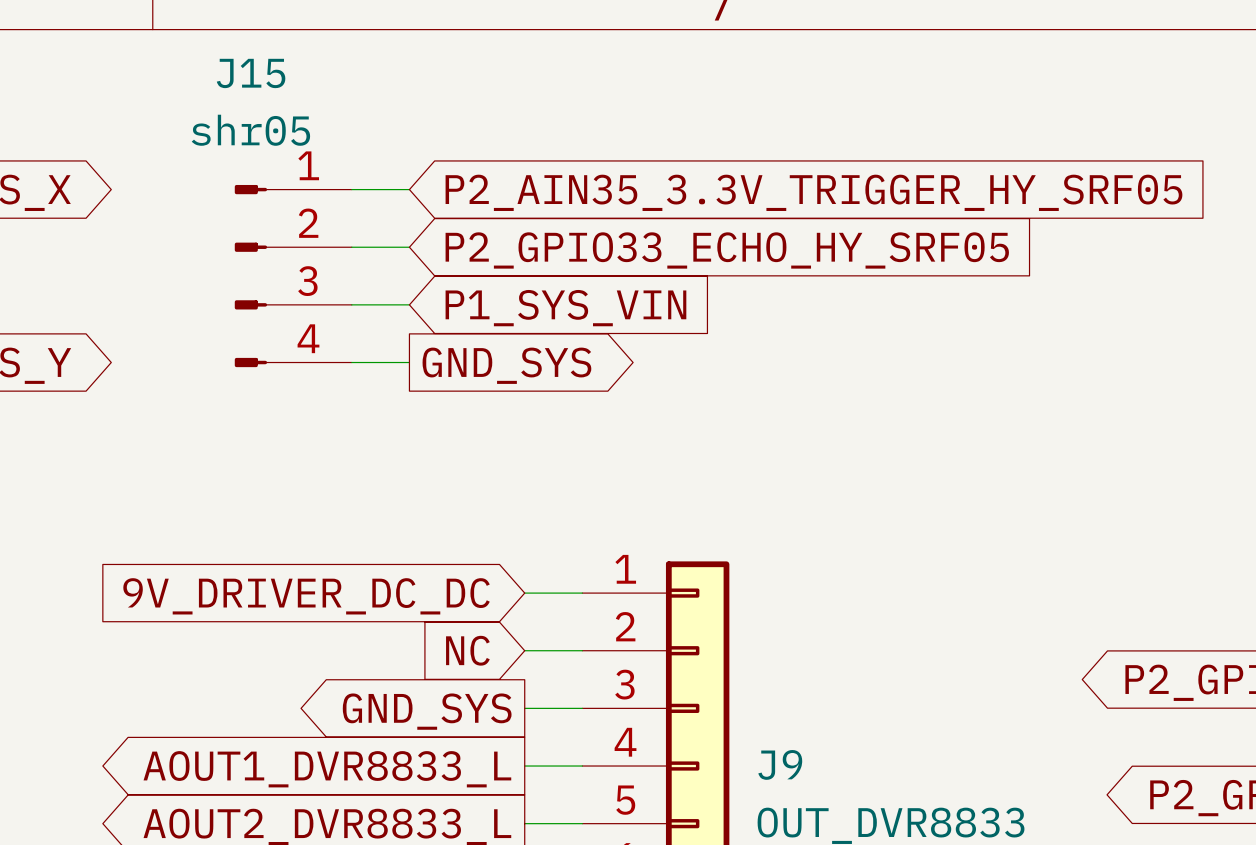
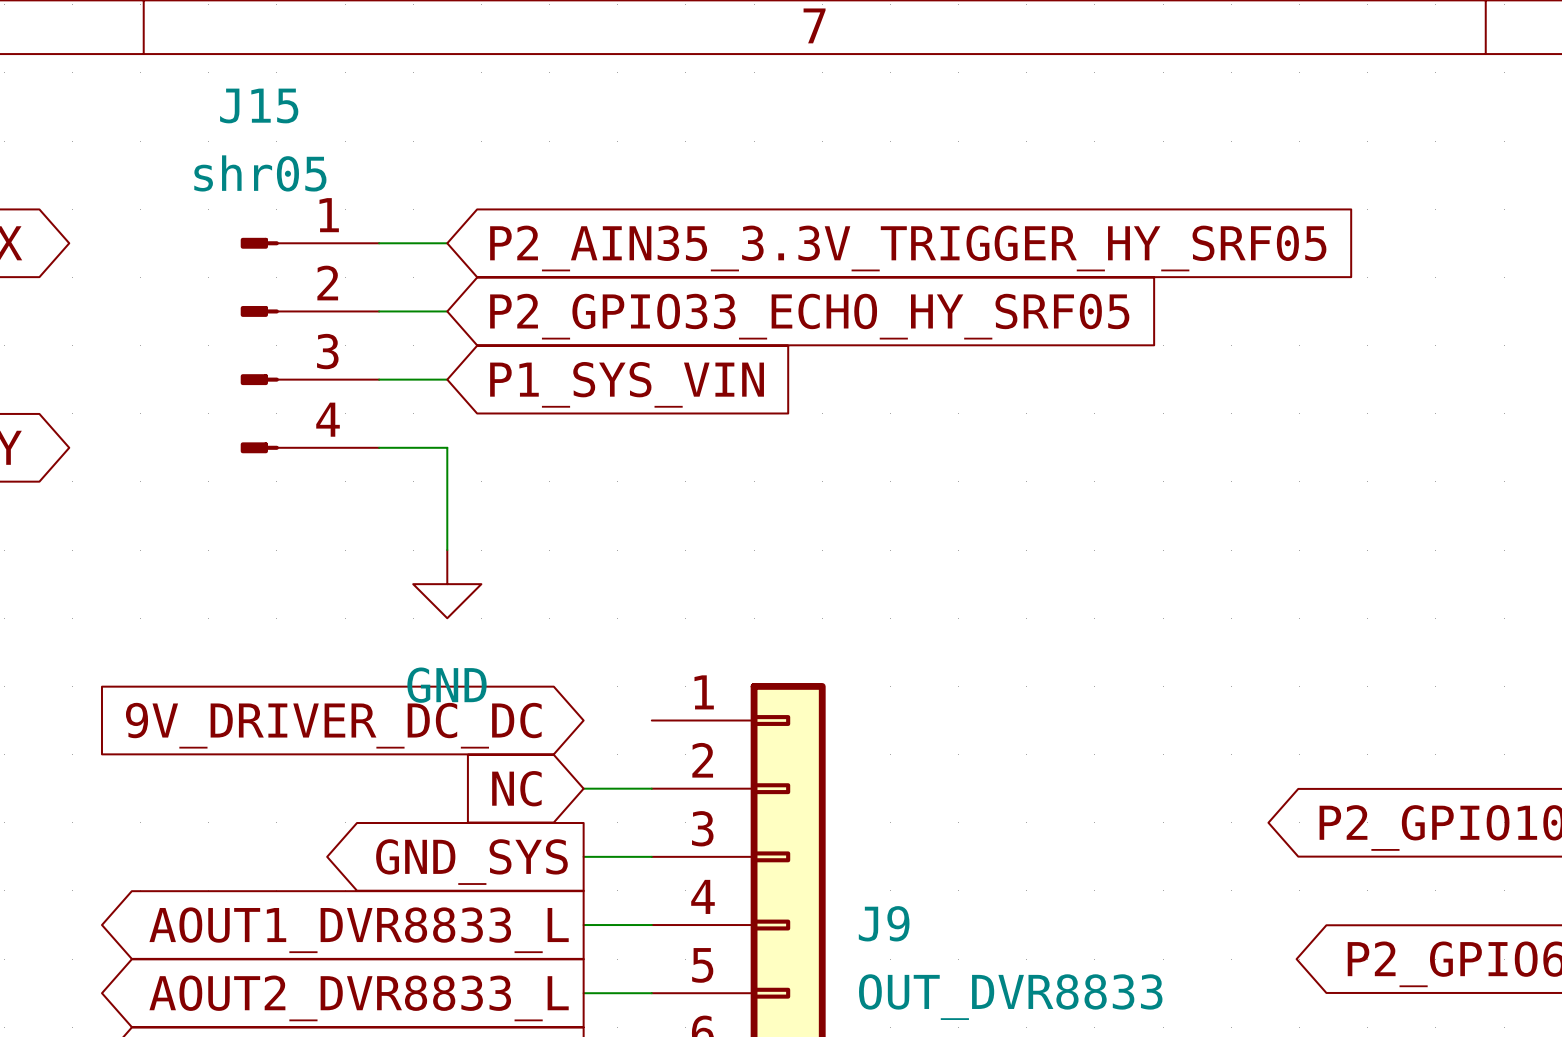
wire: none -> (447, 447) (447, 550)
global label: GND_SYS (506, 365) -> none
power symbol: none -> GND (447, 584)
wire: (524, 593) (582, 593) -> none

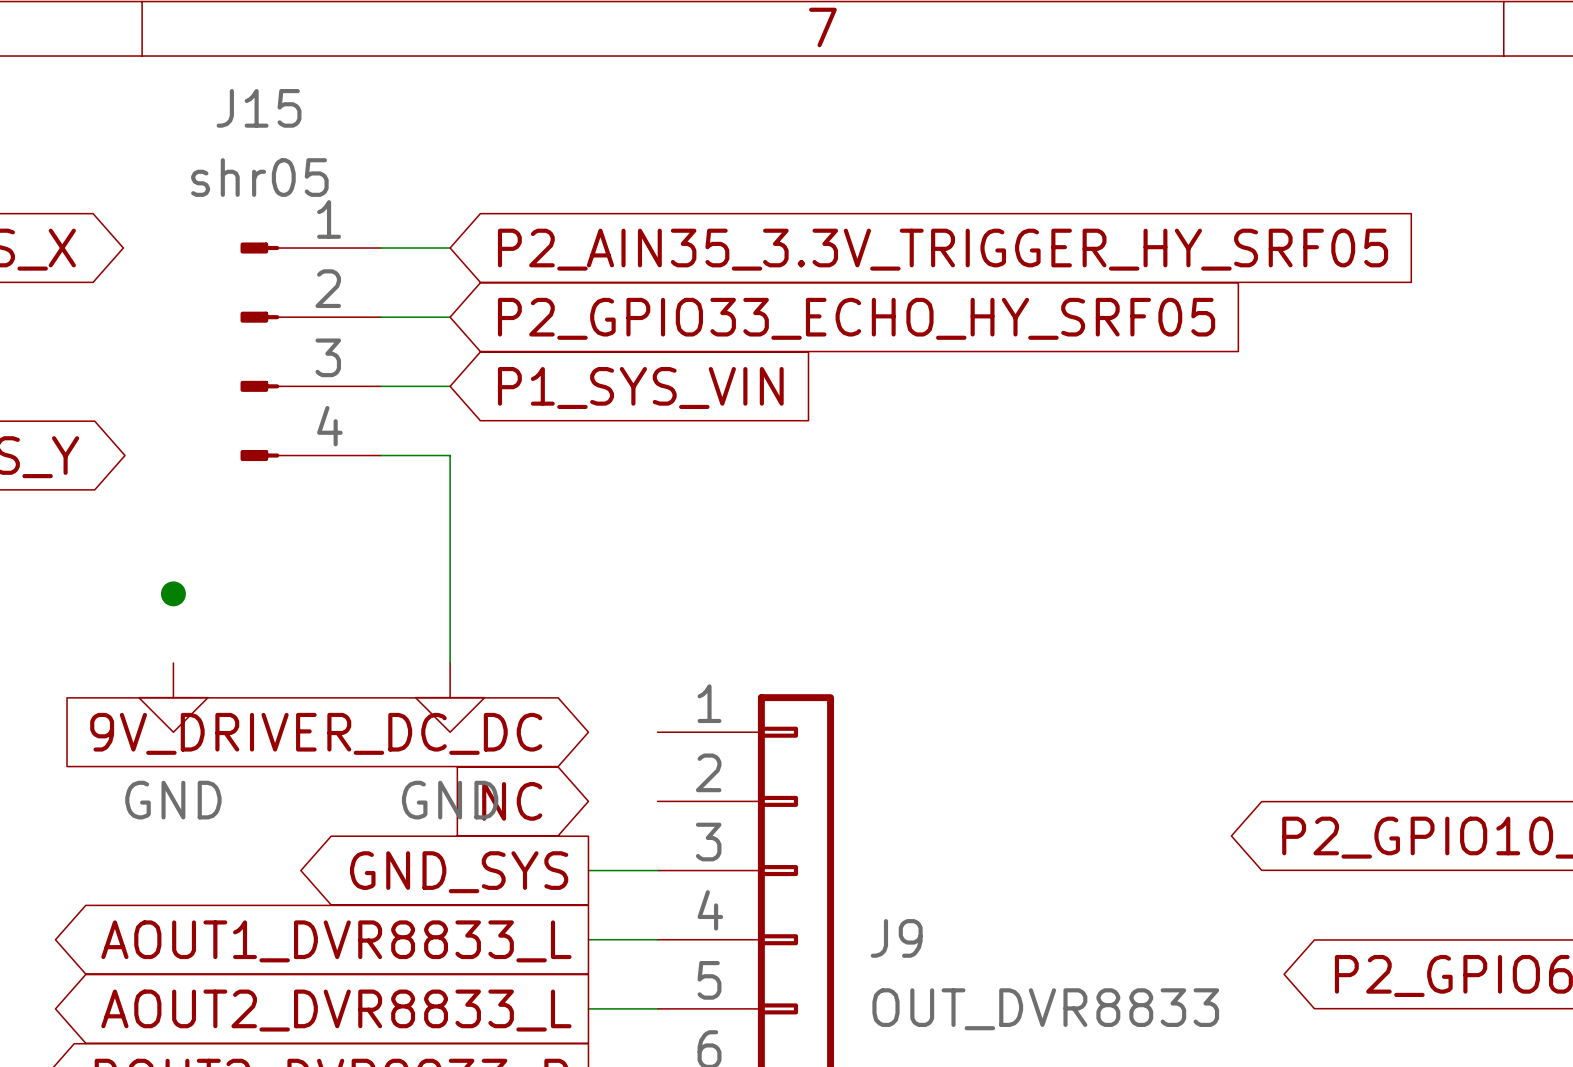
wire: none -> (450, 559) (450, 663)
junction: none -> (173, 593)
power symbol position: GND (447, 584) -> GND (450, 697)
power symbol: none -> GND (173, 697)
wire: (583, 788) (651, 788) -> none

